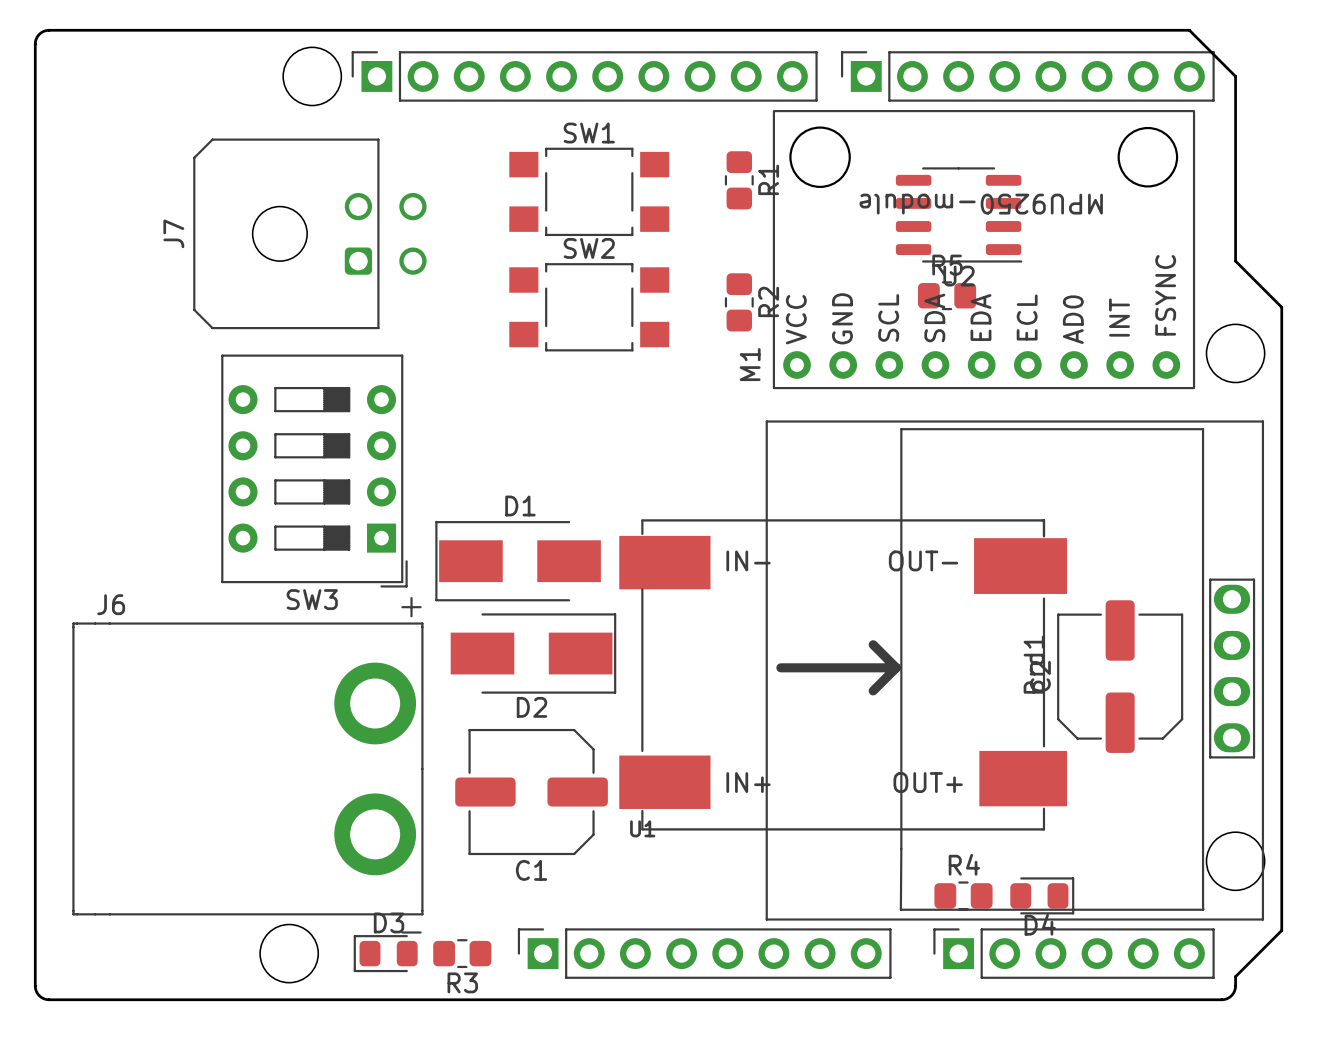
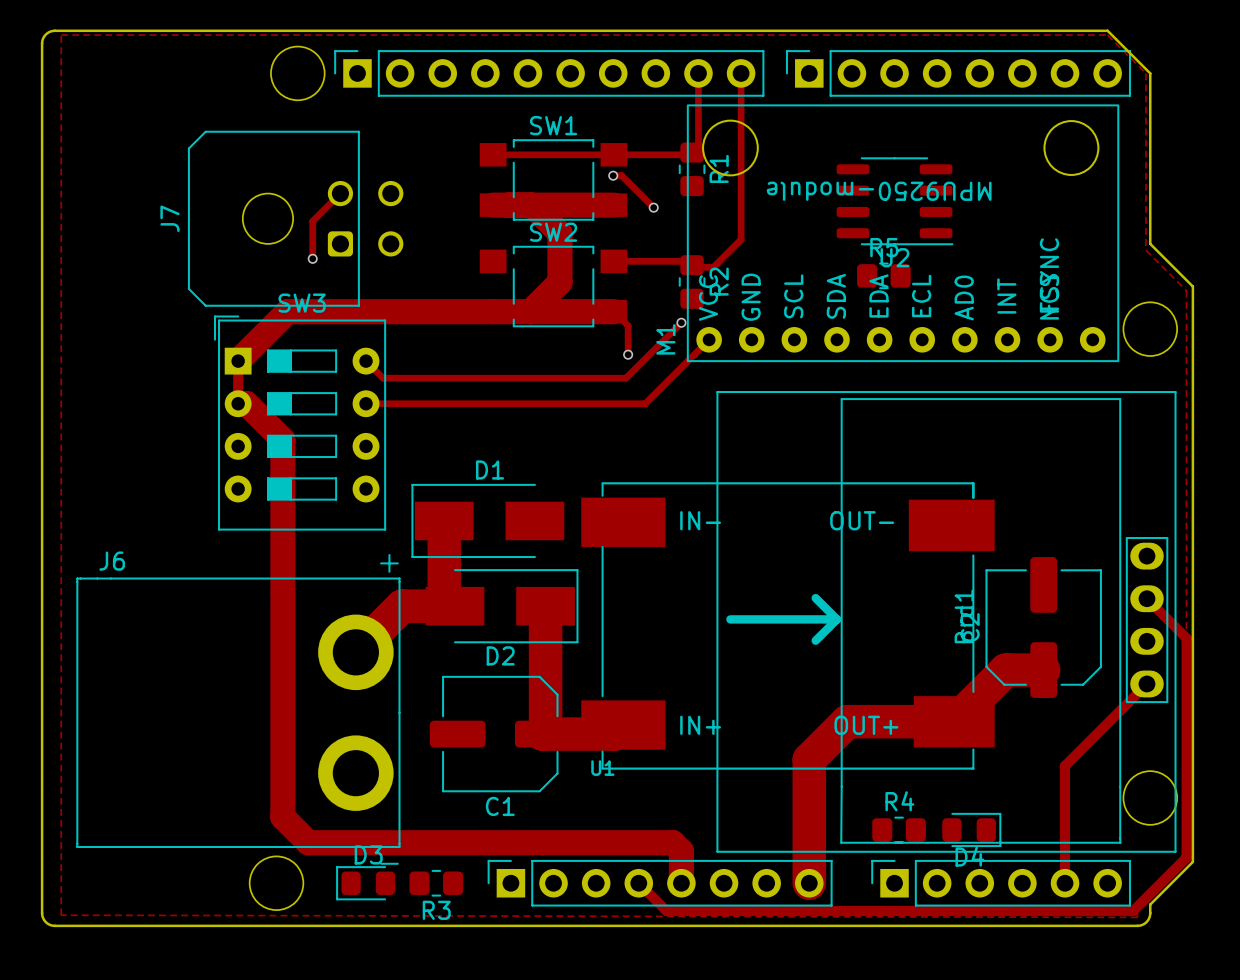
zone outline: none -> (61, 35) (61, 915) (1137, 917) (1137, 902) (1186, 857) (1186, 290) (1146, 250) (1146, 73) (1107, 35) (61, 35)
track: none -> (698, 73) (698, 146) (689, 154) (493, 154)
track: none -> (741, 73) (741, 239) (713, 267) (694, 267) (688, 261) (613, 261)
M1 footprint: [772, 109, 1196, 390] -> [686, 104, 1120, 363]
track: none -> (613, 175) (621, 175) (653, 207)
via: none -> (613, 175)
track: none -> (340, 193) (312, 221) (312, 258)
track: none -> (493, 205) (613, 205)
track: none -> (531, 205) (559, 233) (559, 282) (530, 311)
via: none -> (653, 207)
via: none -> (312, 258)
track: none -> (681, 322) (626, 378) (383, 378) (366, 361)
via: none -> (681, 322)
track: none -> (709, 339) (645, 403) (366, 403)
track: none -> (628, 354) (628, 325) (613, 311) (287, 311) (238, 361) (238, 403) (246, 403) (282, 439) (282, 817) (308, 842) (672, 842) (681, 851) (681, 883)
via: none -> (628, 354)
SW3 rotation: 0° (314, 471) -> 180° (300, 423)
track: none -> (444, 520) (444, 595) (454, 606) (402, 606) (355, 652)
track: none -> (1146, 598) (1186, 638) (1186, 857) (1133, 910) (666, 910) (638, 883)
track: none -> (545, 606) (545, 731) (542, 734) (614, 734) (623, 725)
track: none -> (1043, 670) (1005, 670) (954, 721) (847, 721) (809, 759) (809, 883)
track: none -> (1146, 683) (1065, 765) (1065, 883)

